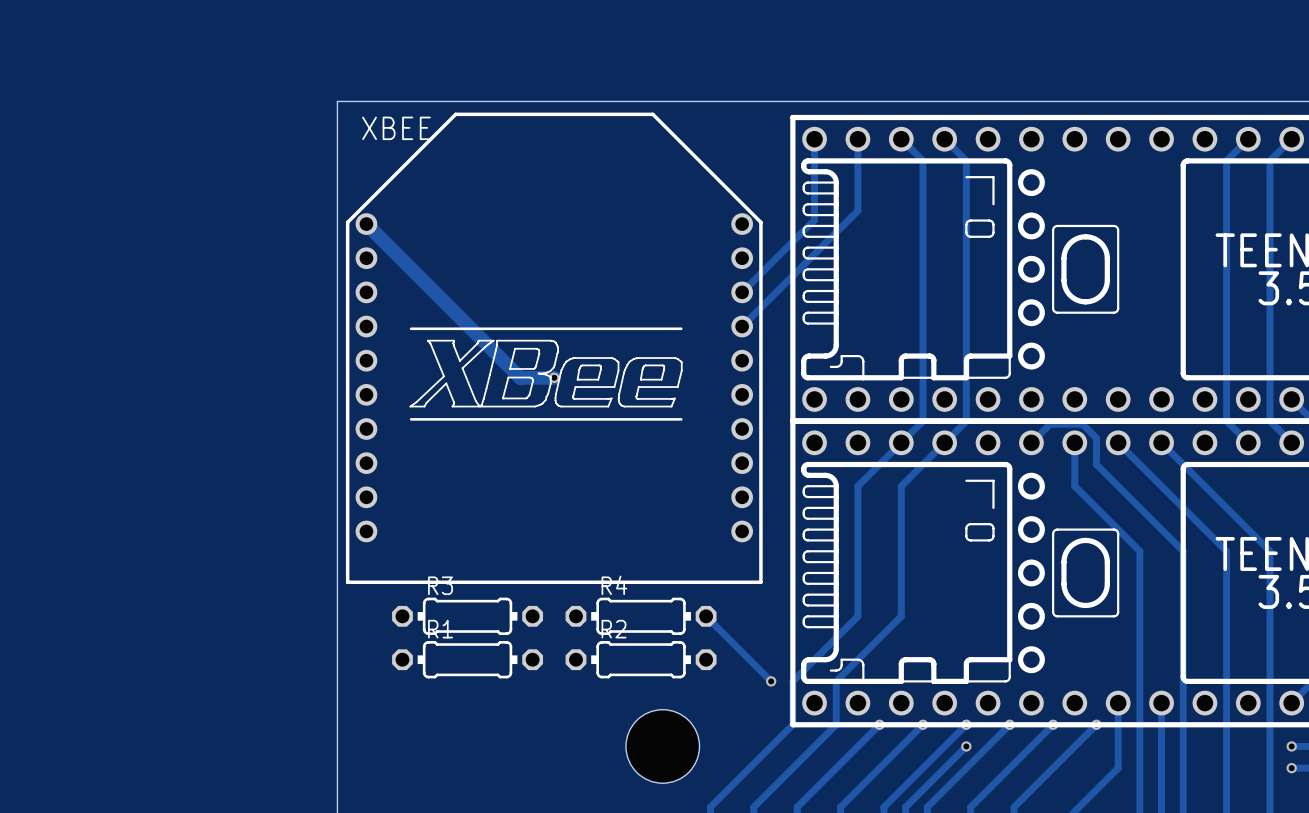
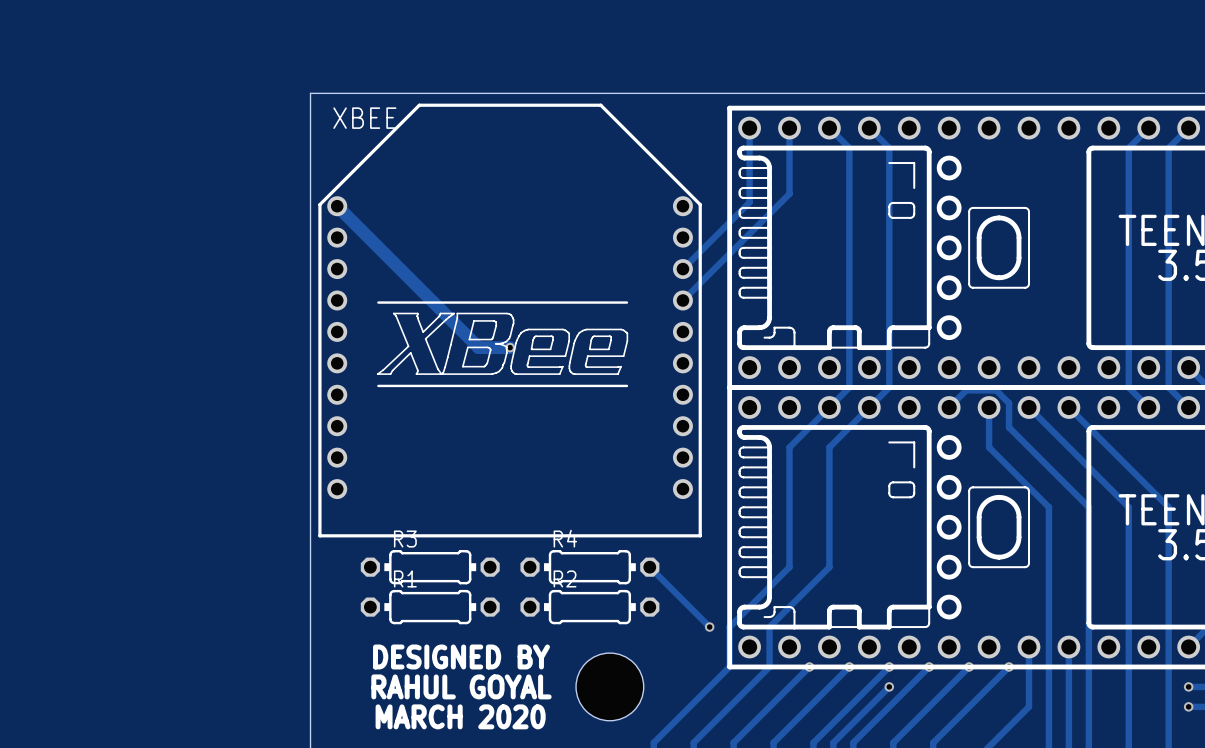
text: none -> DESIGNED BY (461, 656)
text: none -> RAHUL GOYAL (461, 686)
text: none -> MARCH 2020 (460, 716)

